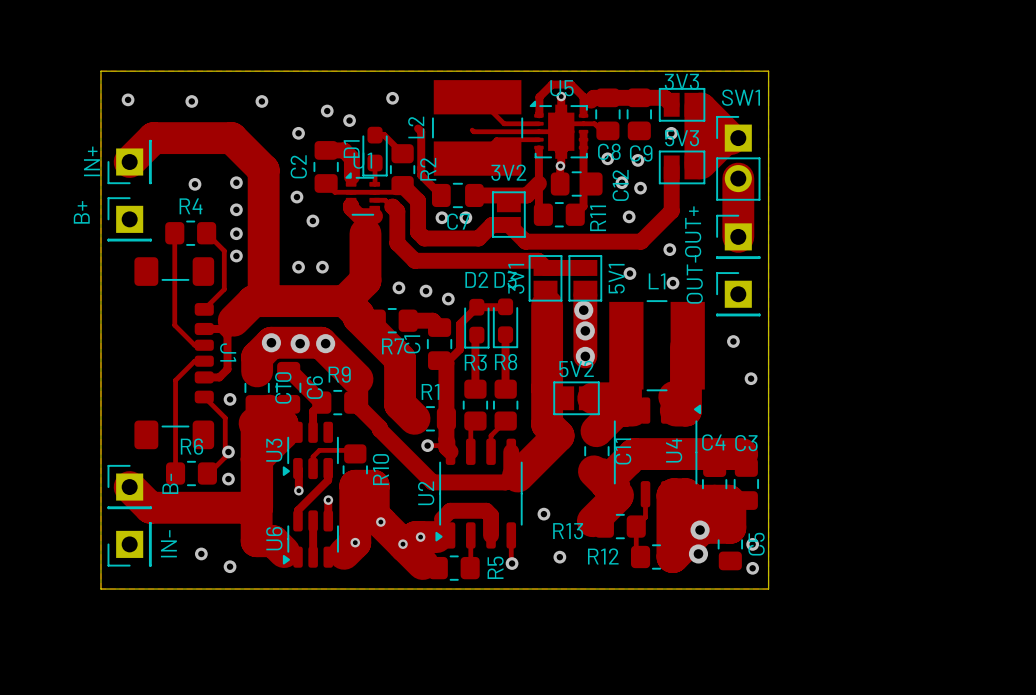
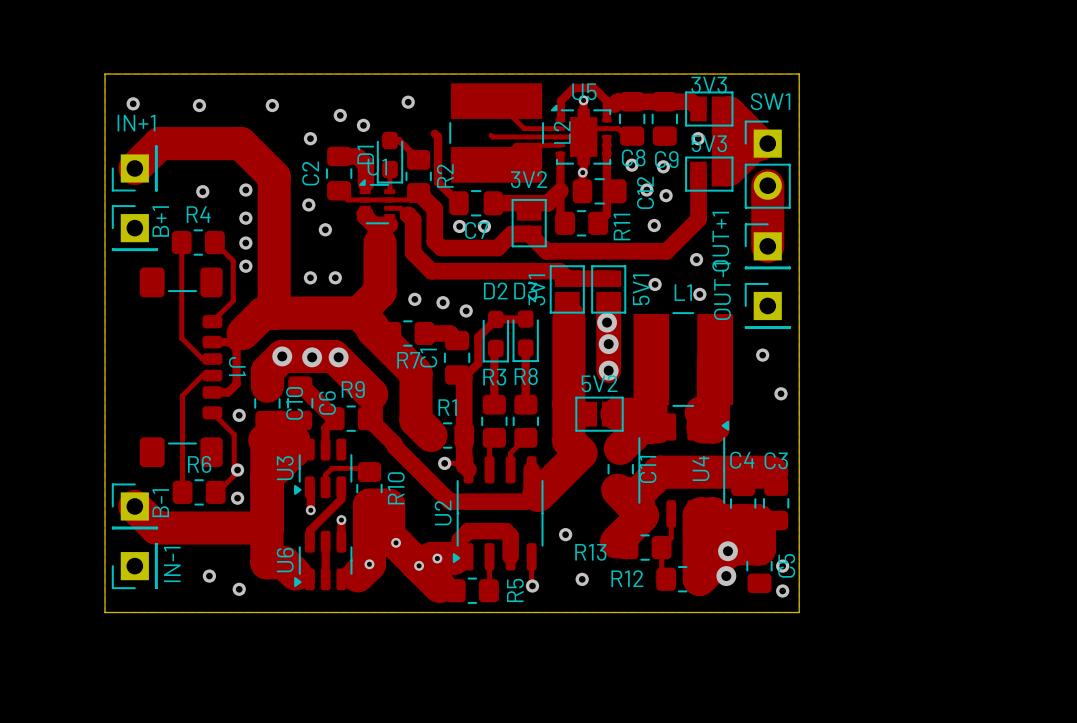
L2 name position: L2 (416, 127) -> L2 (562, 132)
IN+ name: IN+ (91, 161) -> IN+1 (136, 123)
B+ name: B+ (81, 212) -> B+1 (160, 221)
OUT+ name: OUT+ (693, 231) -> OUT+1 (720, 241)
OUT- name: OUT- (694, 279) -> OUT-1 (722, 291)
B- name: B- (170, 483) -> B-1 (160, 503)
IN- name: IN- (168, 543) -> IN-1 (172, 564)

